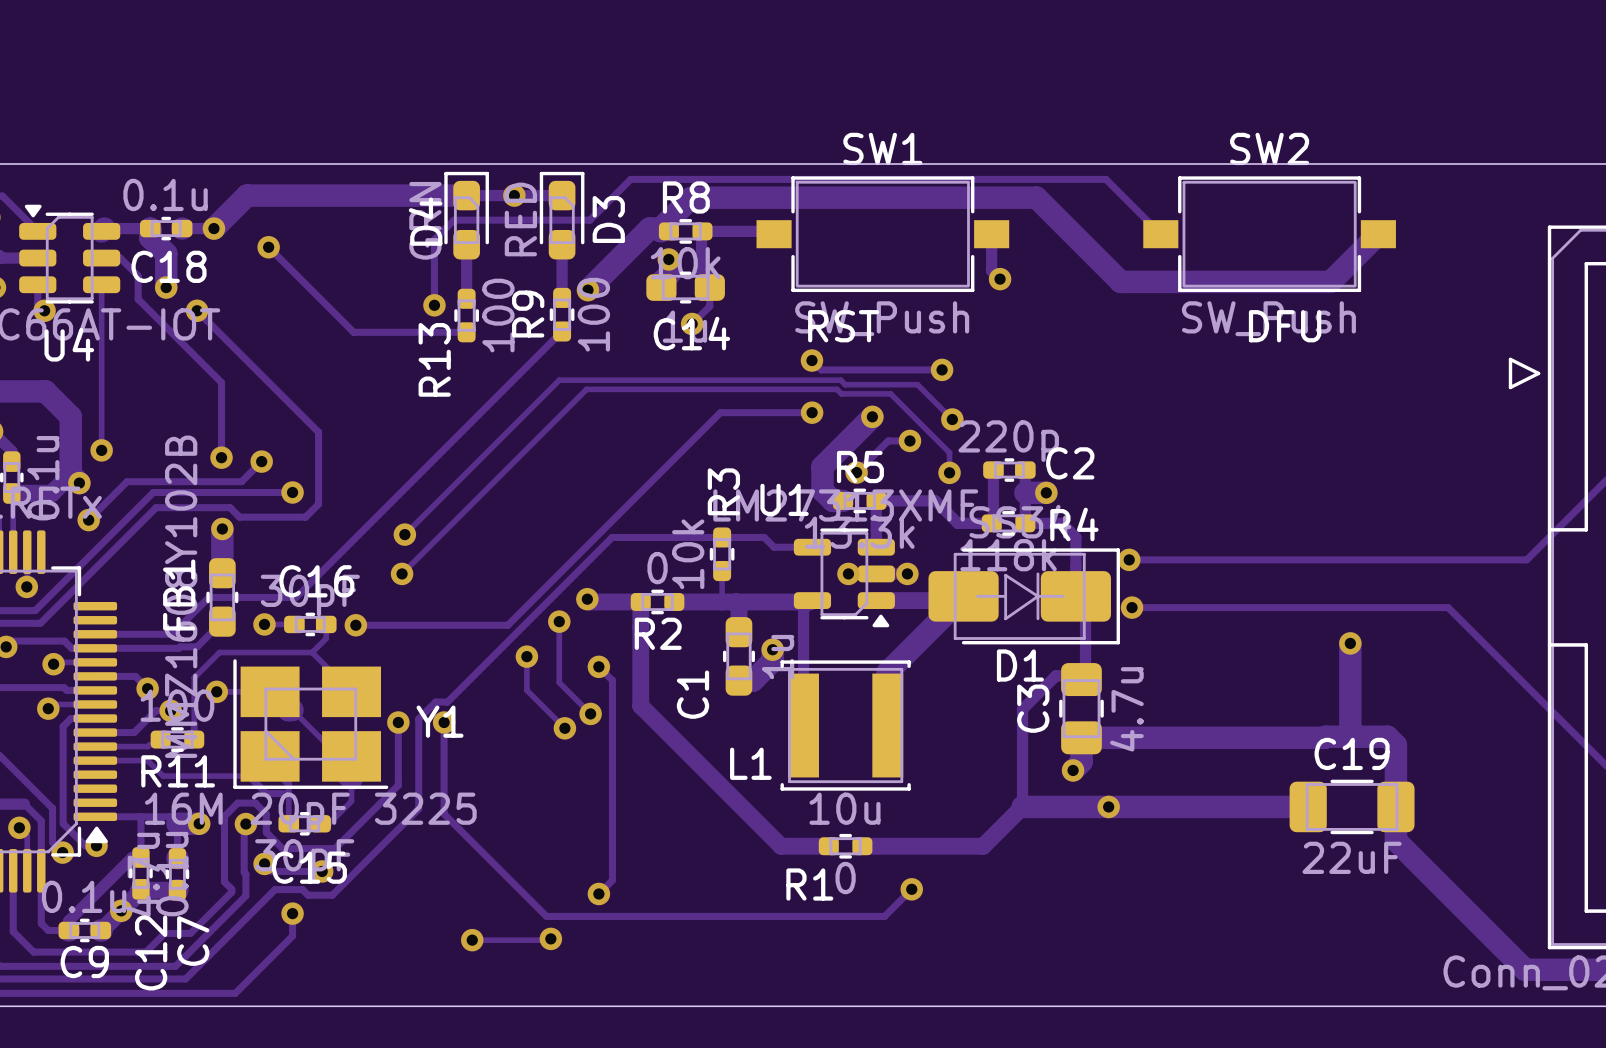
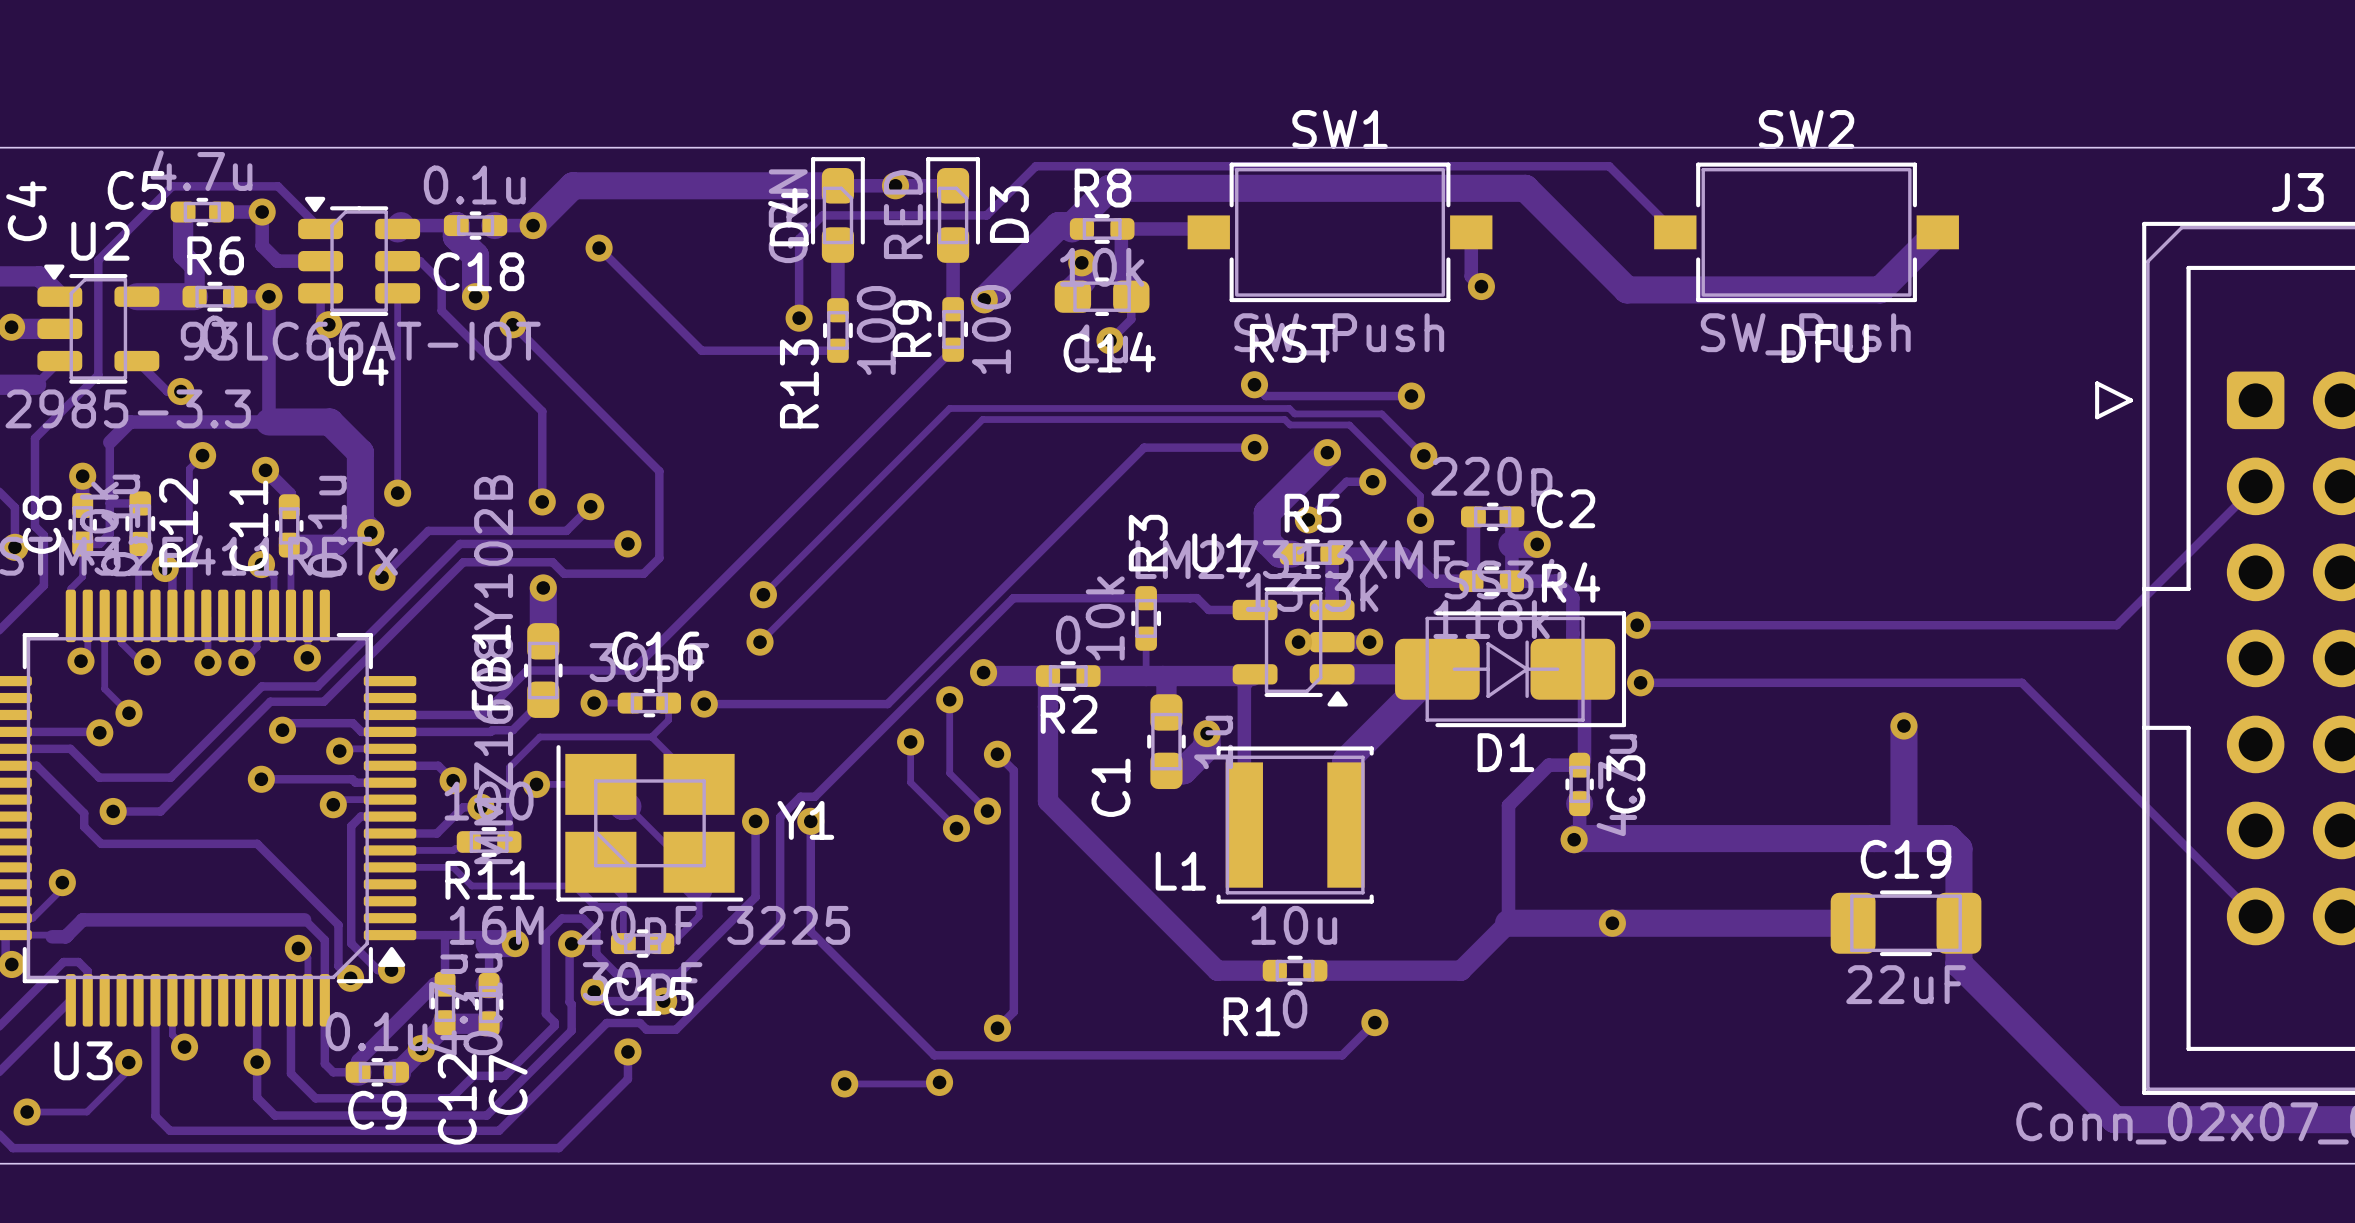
C3 footprint: [1059, 663, 1104, 755] -> [1565, 752, 1594, 817]
C3 name position: C3 (1033, 708) -> C3 (1625, 784)
track: (1325, 736) (1081, 737) (1081, 762) (1073, 770) -> (1874, 838) (1574, 839) (1579, 834) (1579, 803)
via position: (1073, 770) -> (1574, 839)

